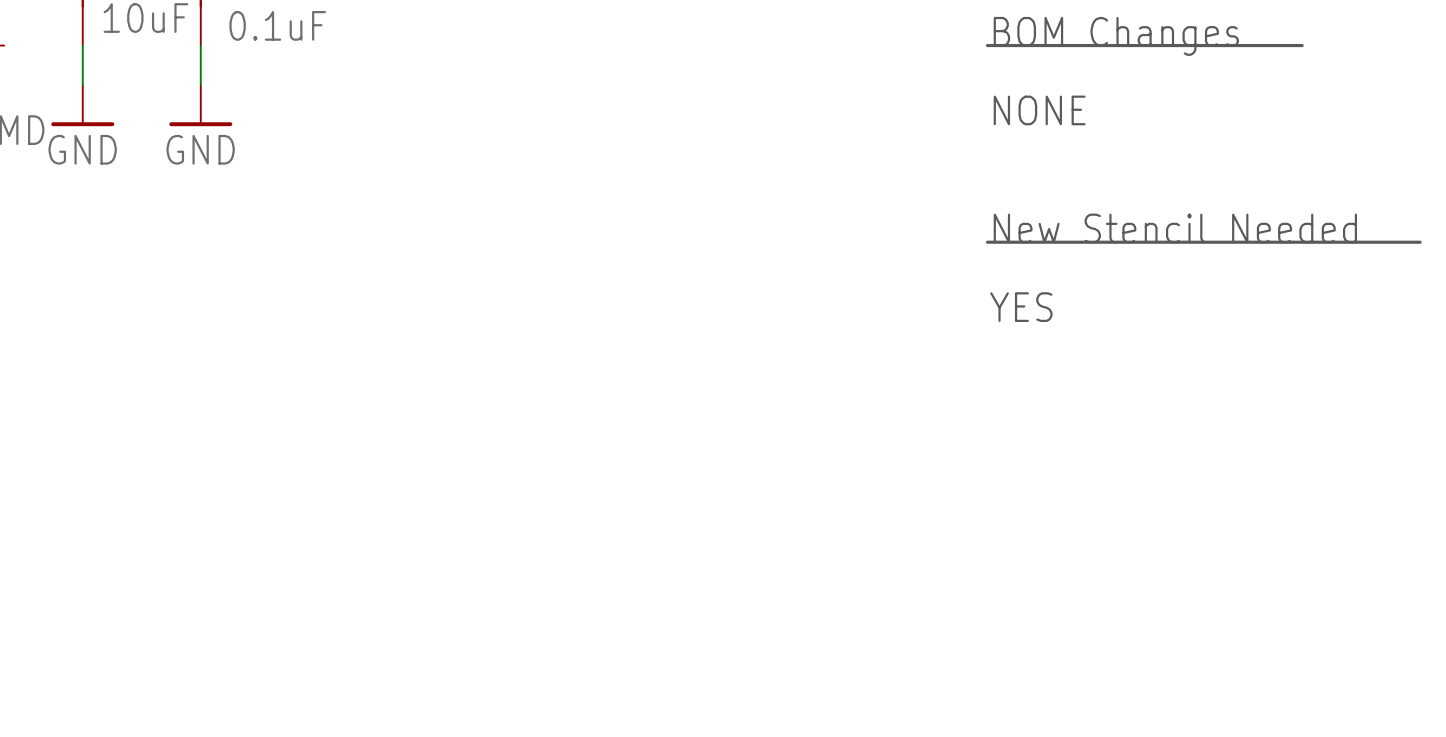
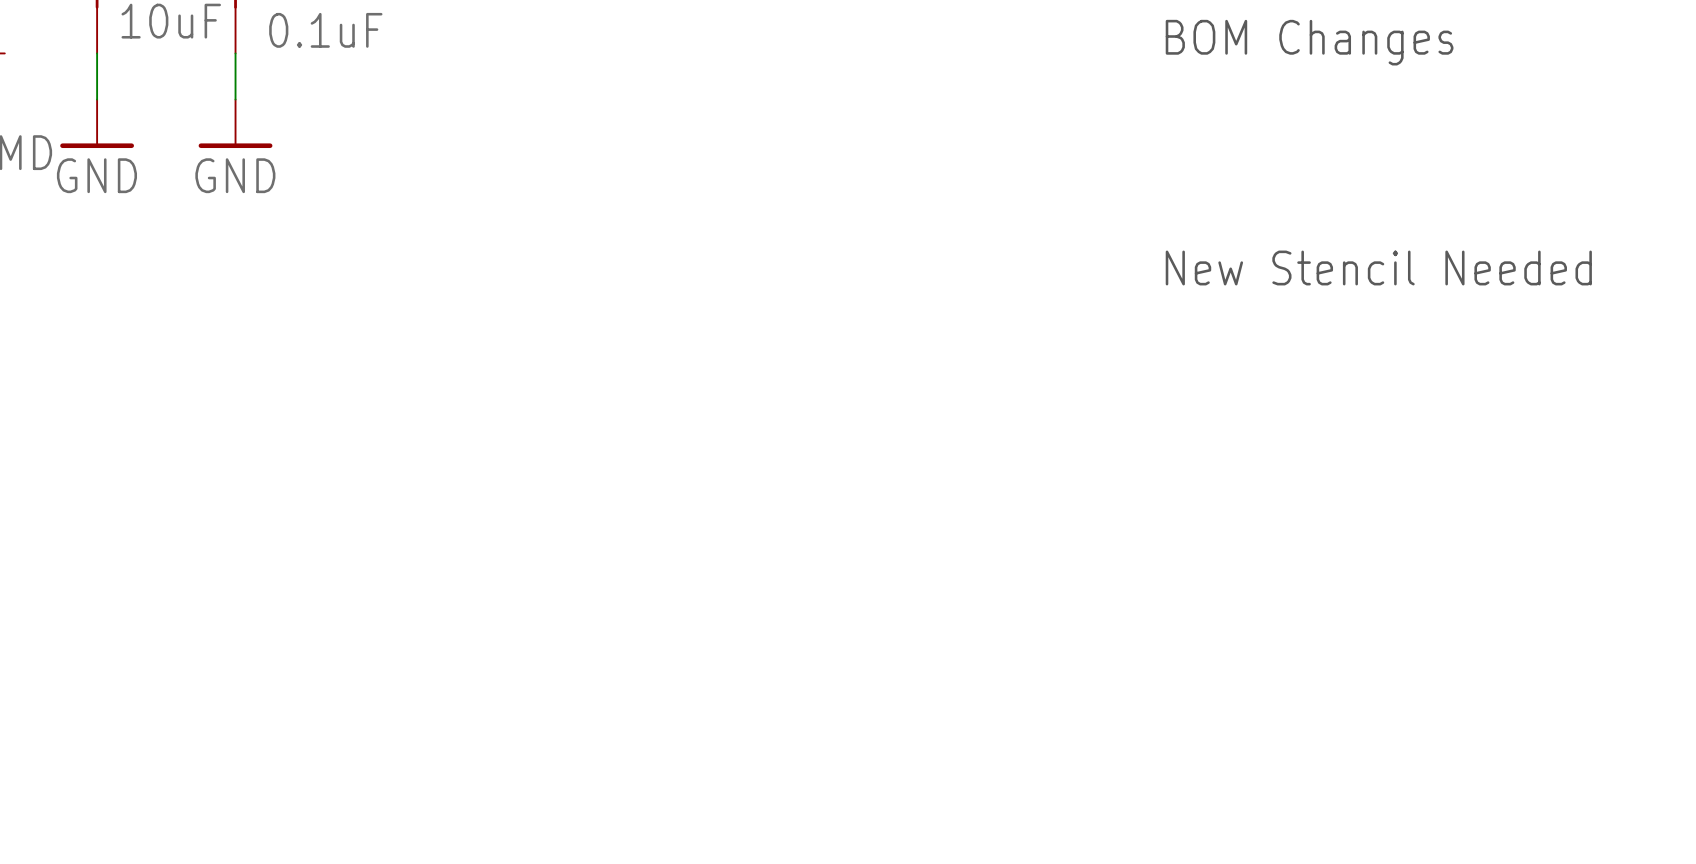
line: (987, 45) (1302, 45) -> none
text: NONE (1039, 110) -> none
line: (987, 242) (1420, 242) -> none
text: YES (1021, 307) -> none

